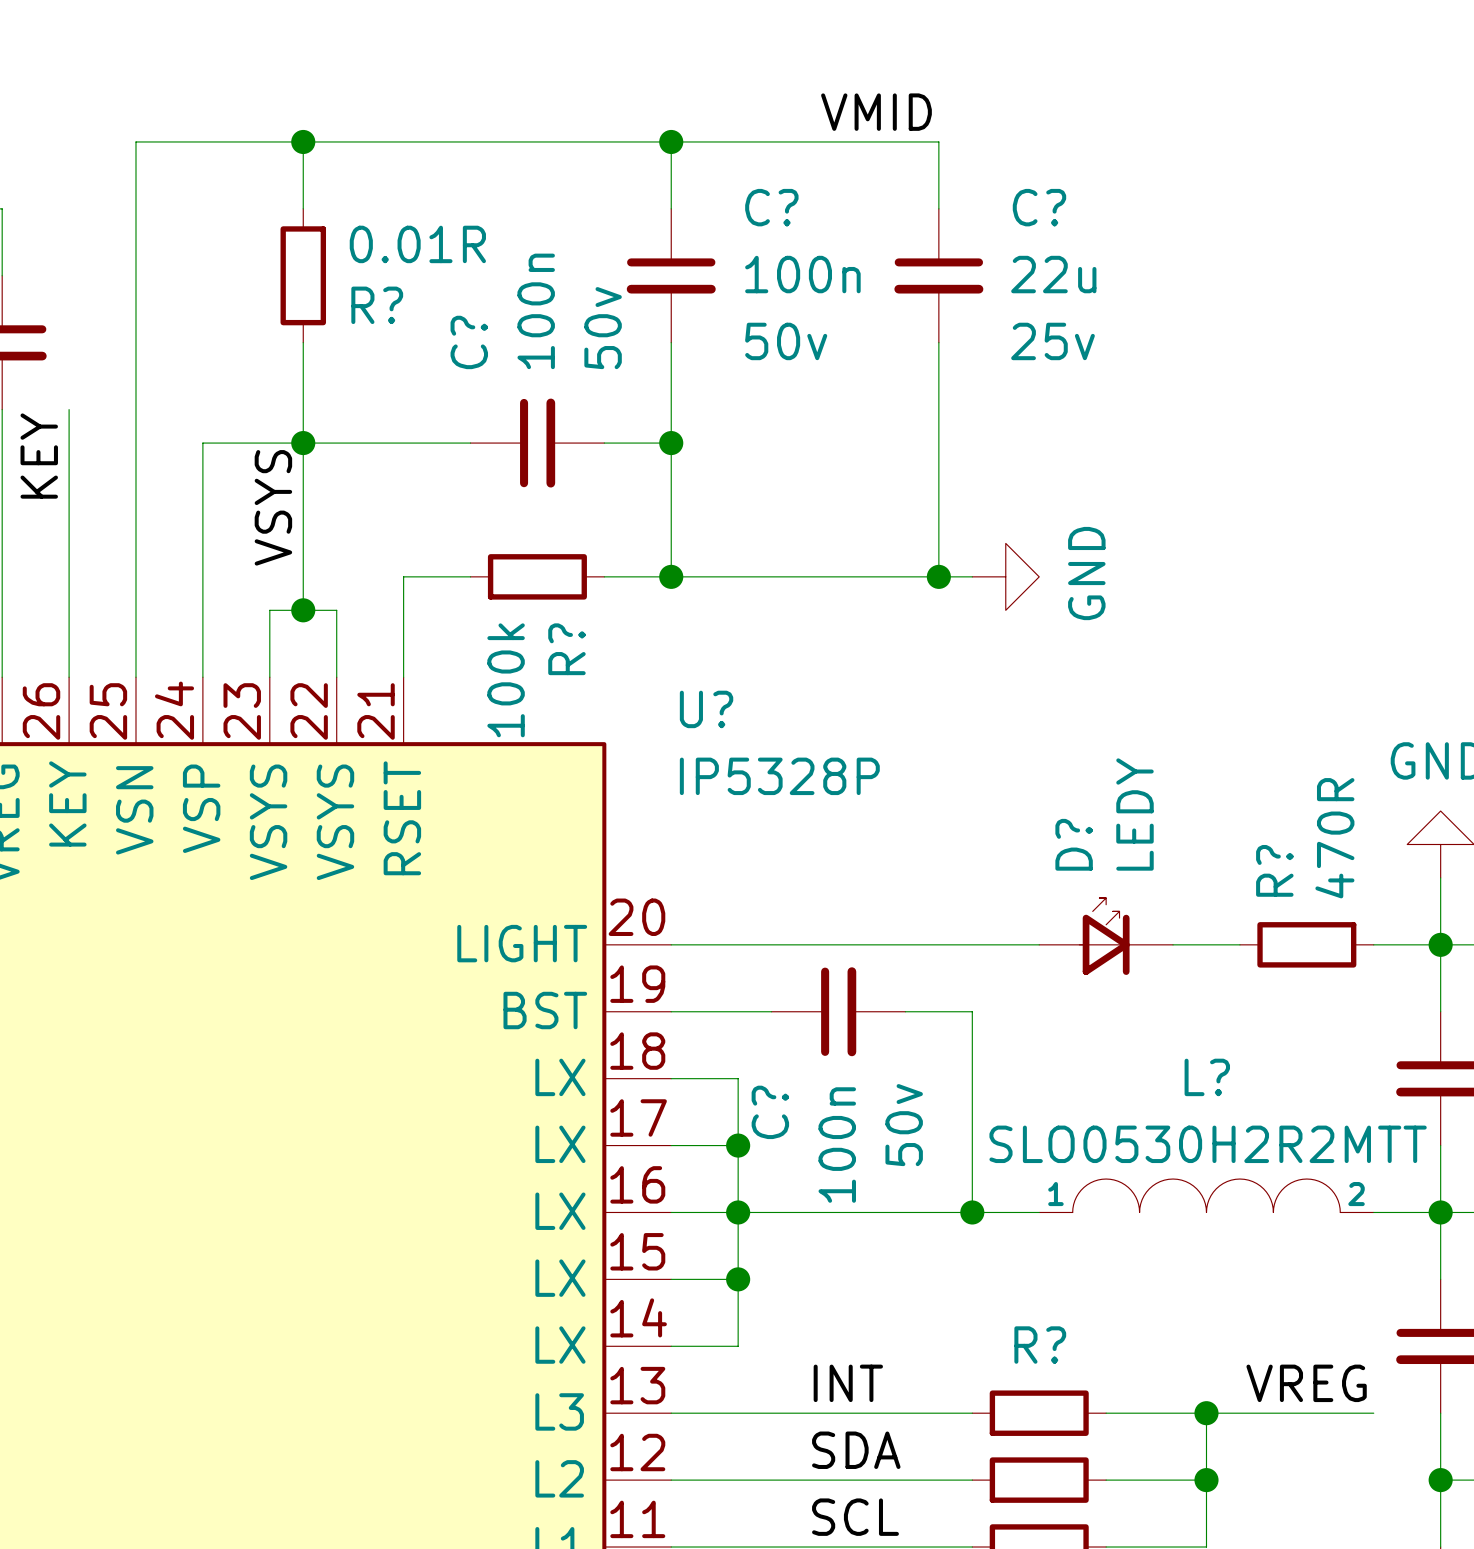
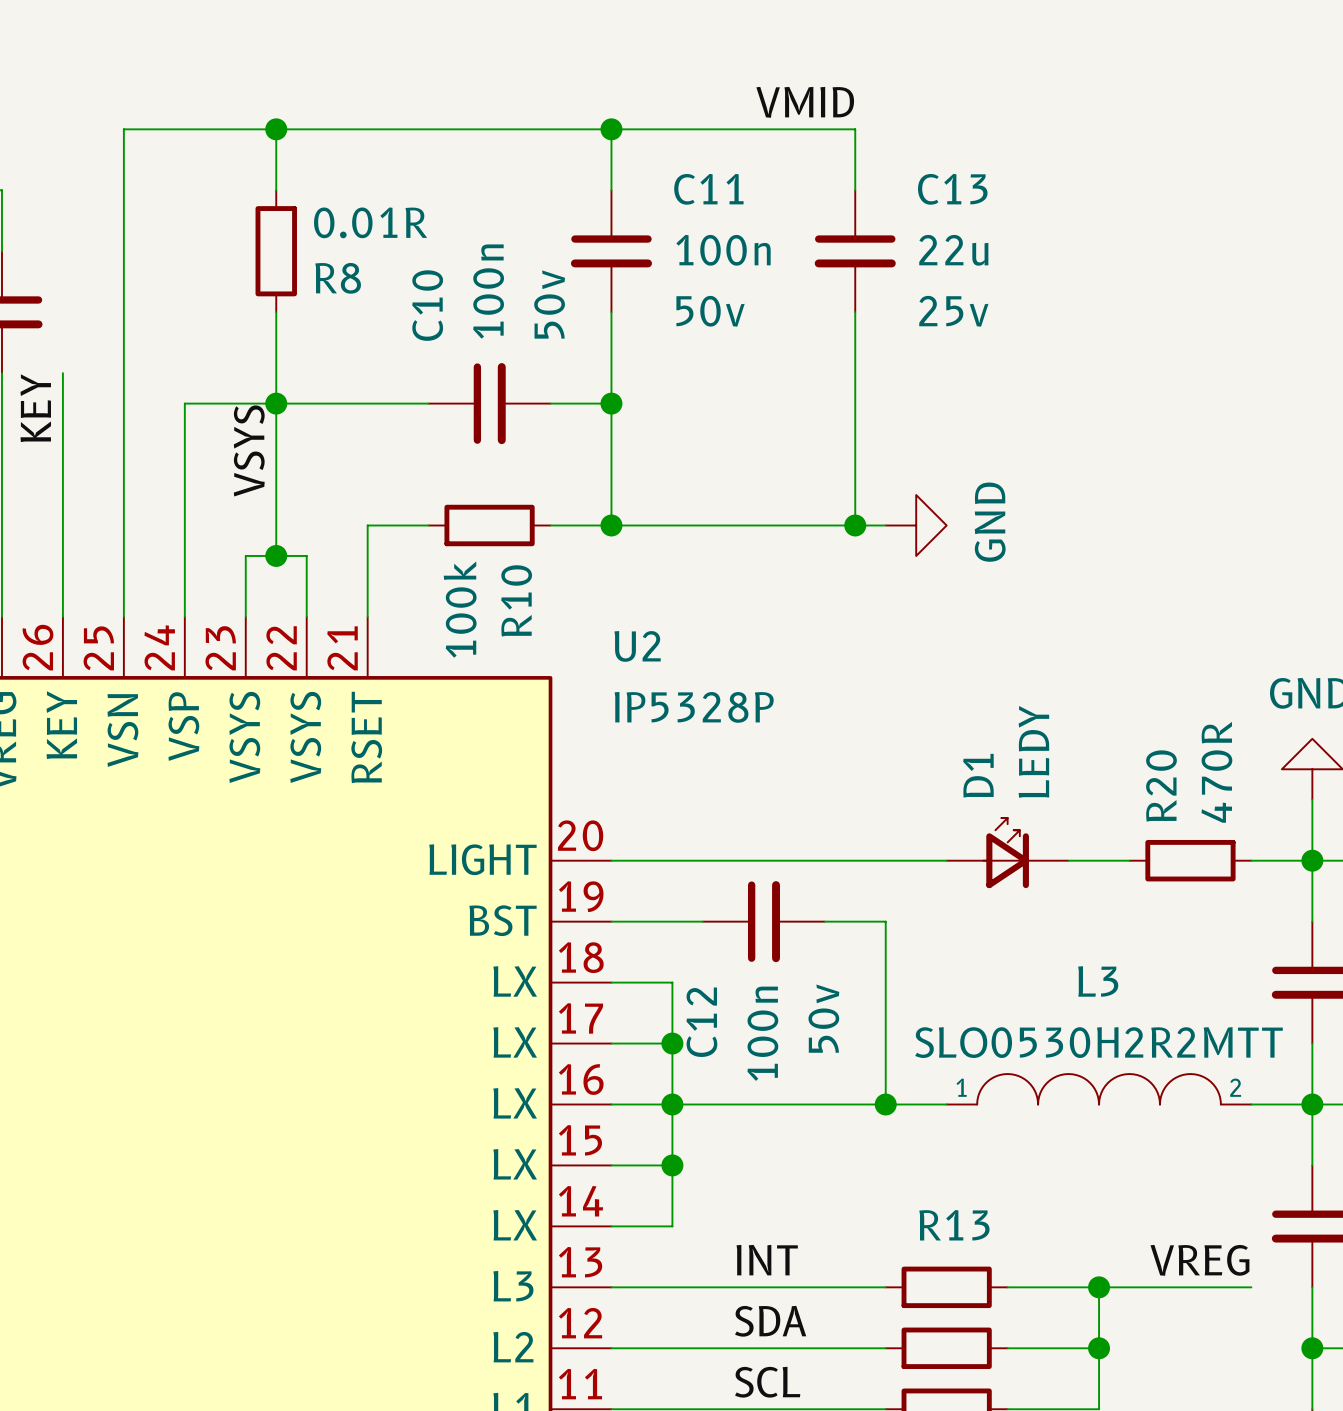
C? name: C? (771, 207) -> C11 (708, 189)
C? name: C? (1039, 207) -> C13 (952, 189)
R? name: R? (377, 305) -> R8 (338, 278)
C? name: C? (469, 342) -> C10 (427, 305)
R? name: R? (566, 649) -> R10 (516, 600)
U? name: U? (706, 709) -> U2 (637, 646)
D? name: D? (1074, 844) -> D1 (978, 775)
R? name: R? (1274, 870) -> R20 (1161, 786)
L? name: L? (1207, 1077) -> L3 (1098, 981)
C? name: C? (770, 1112) -> C12 (701, 1022)
R? name: R? (1040, 1345) -> R13 (954, 1225)

